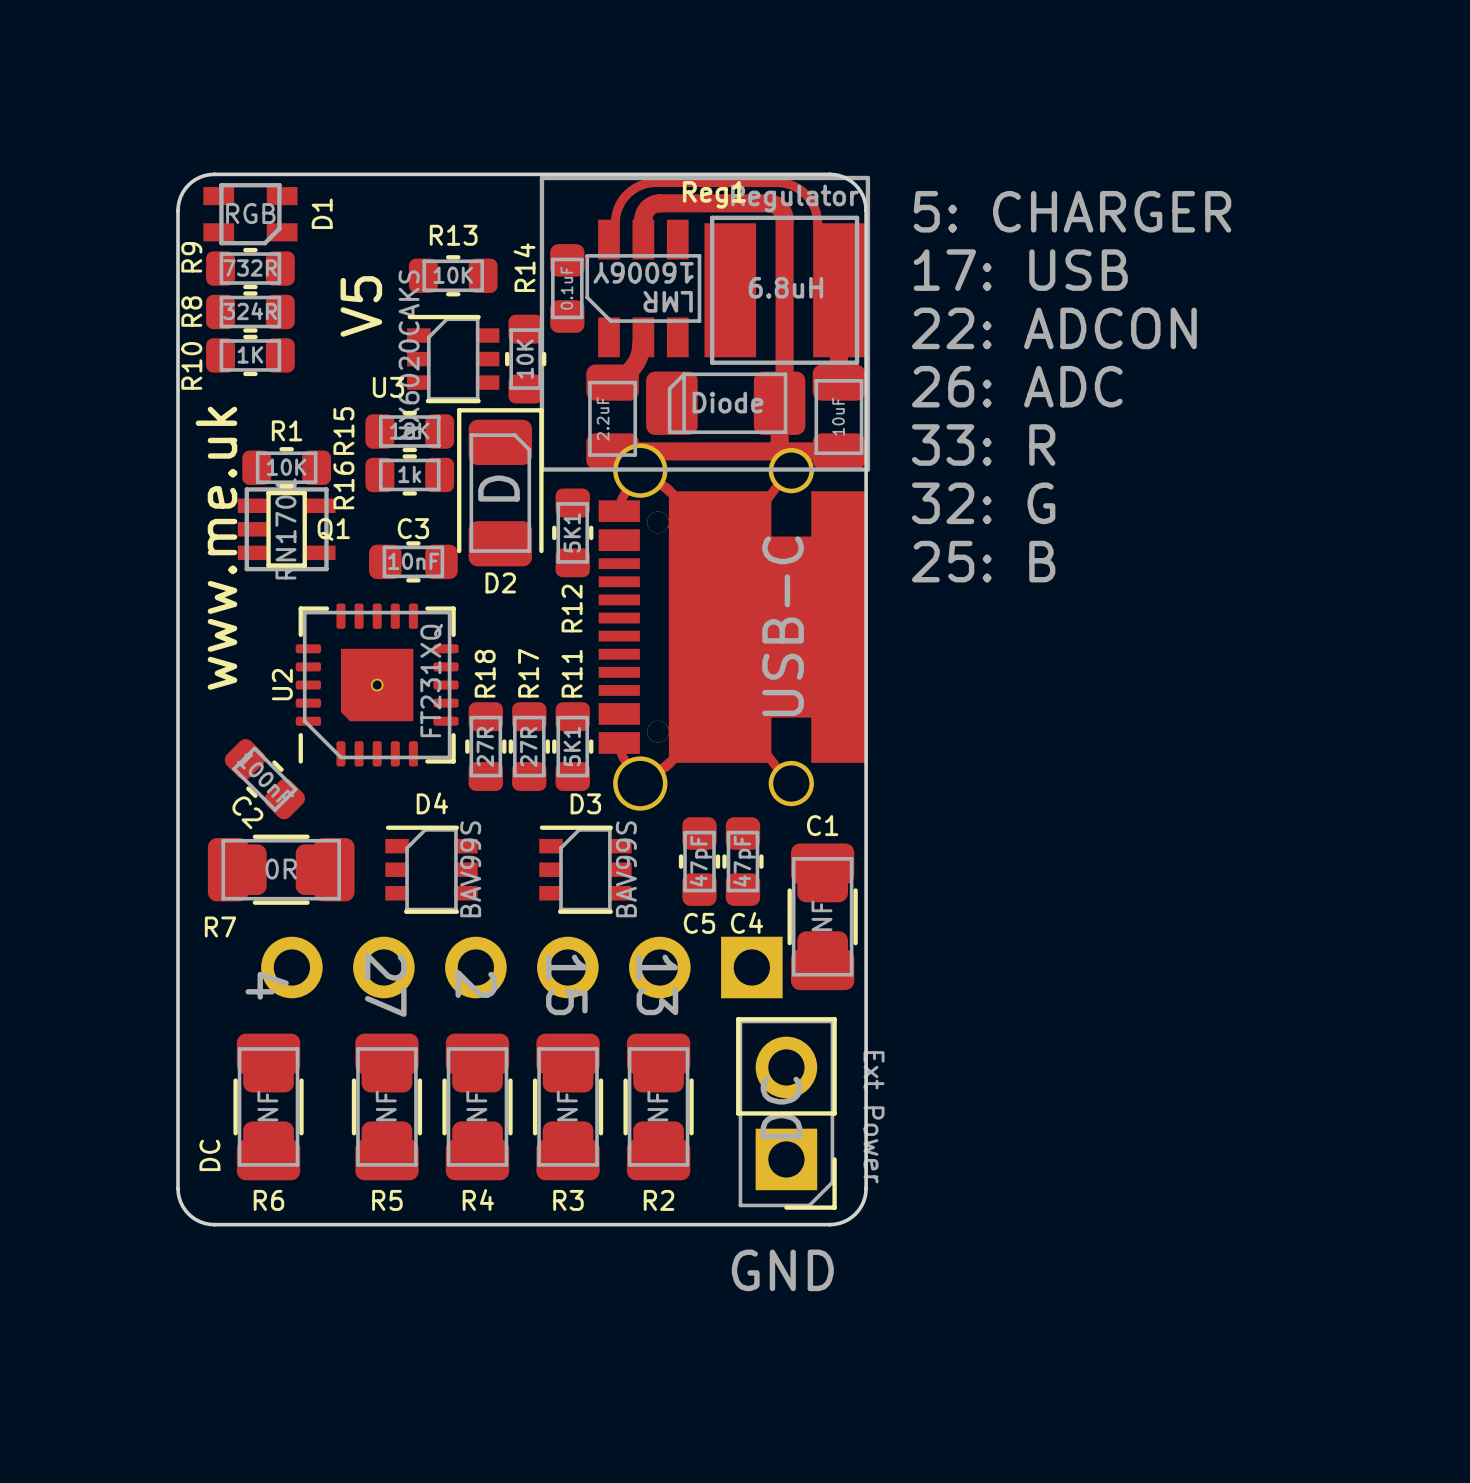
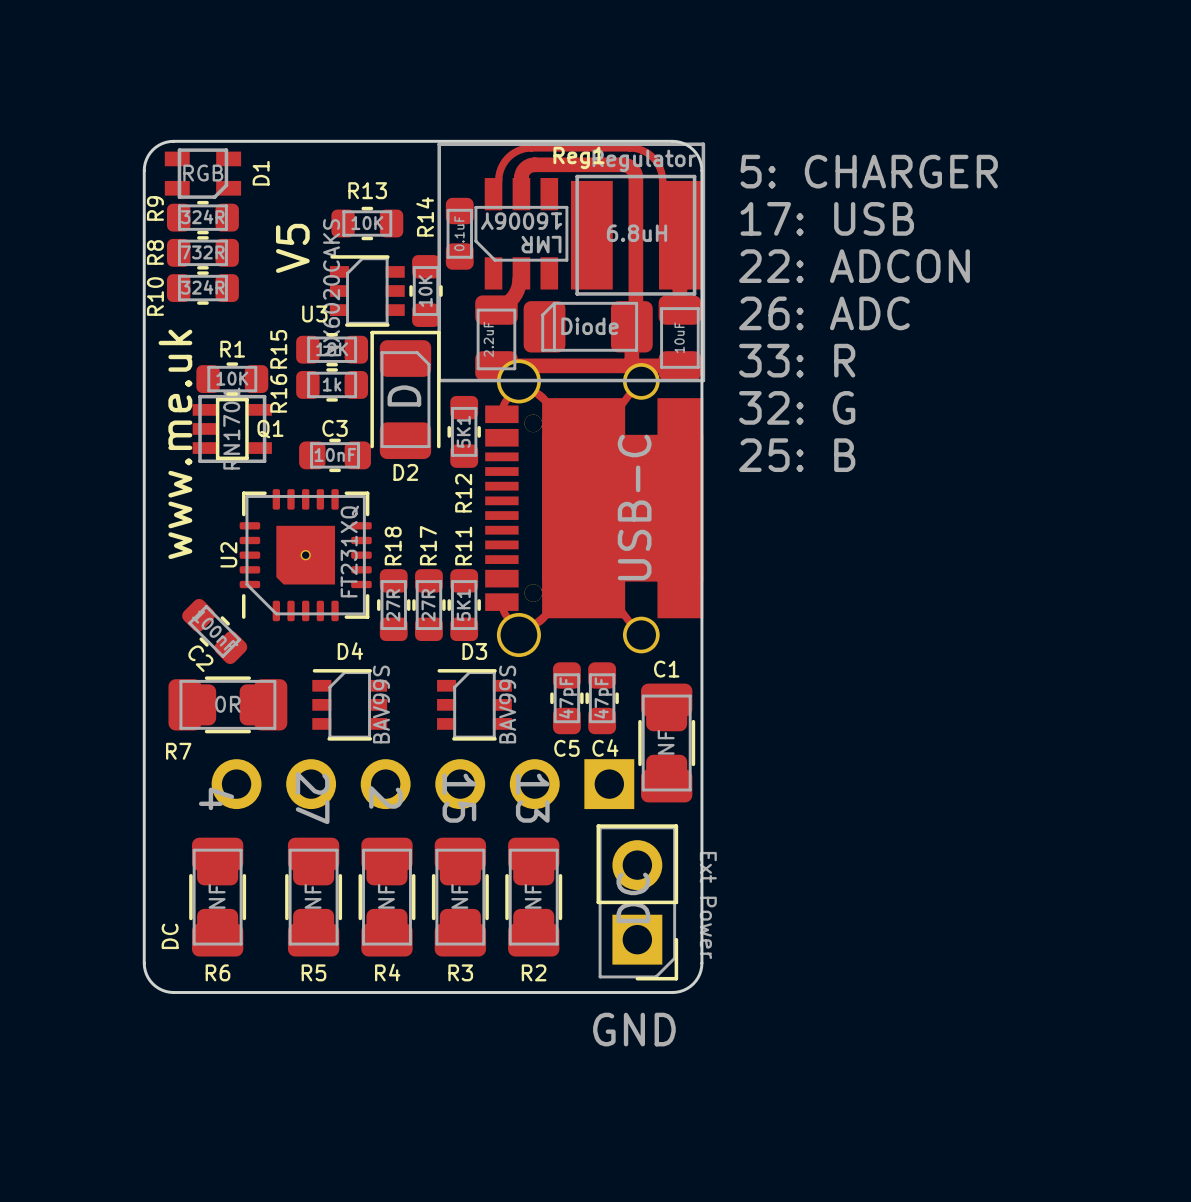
R9 value: 732R (250, 267) -> 324R (202, 216)
R8 value: 324R (250, 311) -> 732R (202, 252)
R10 value: 1K (250, 354) -> 324R (202, 287)

